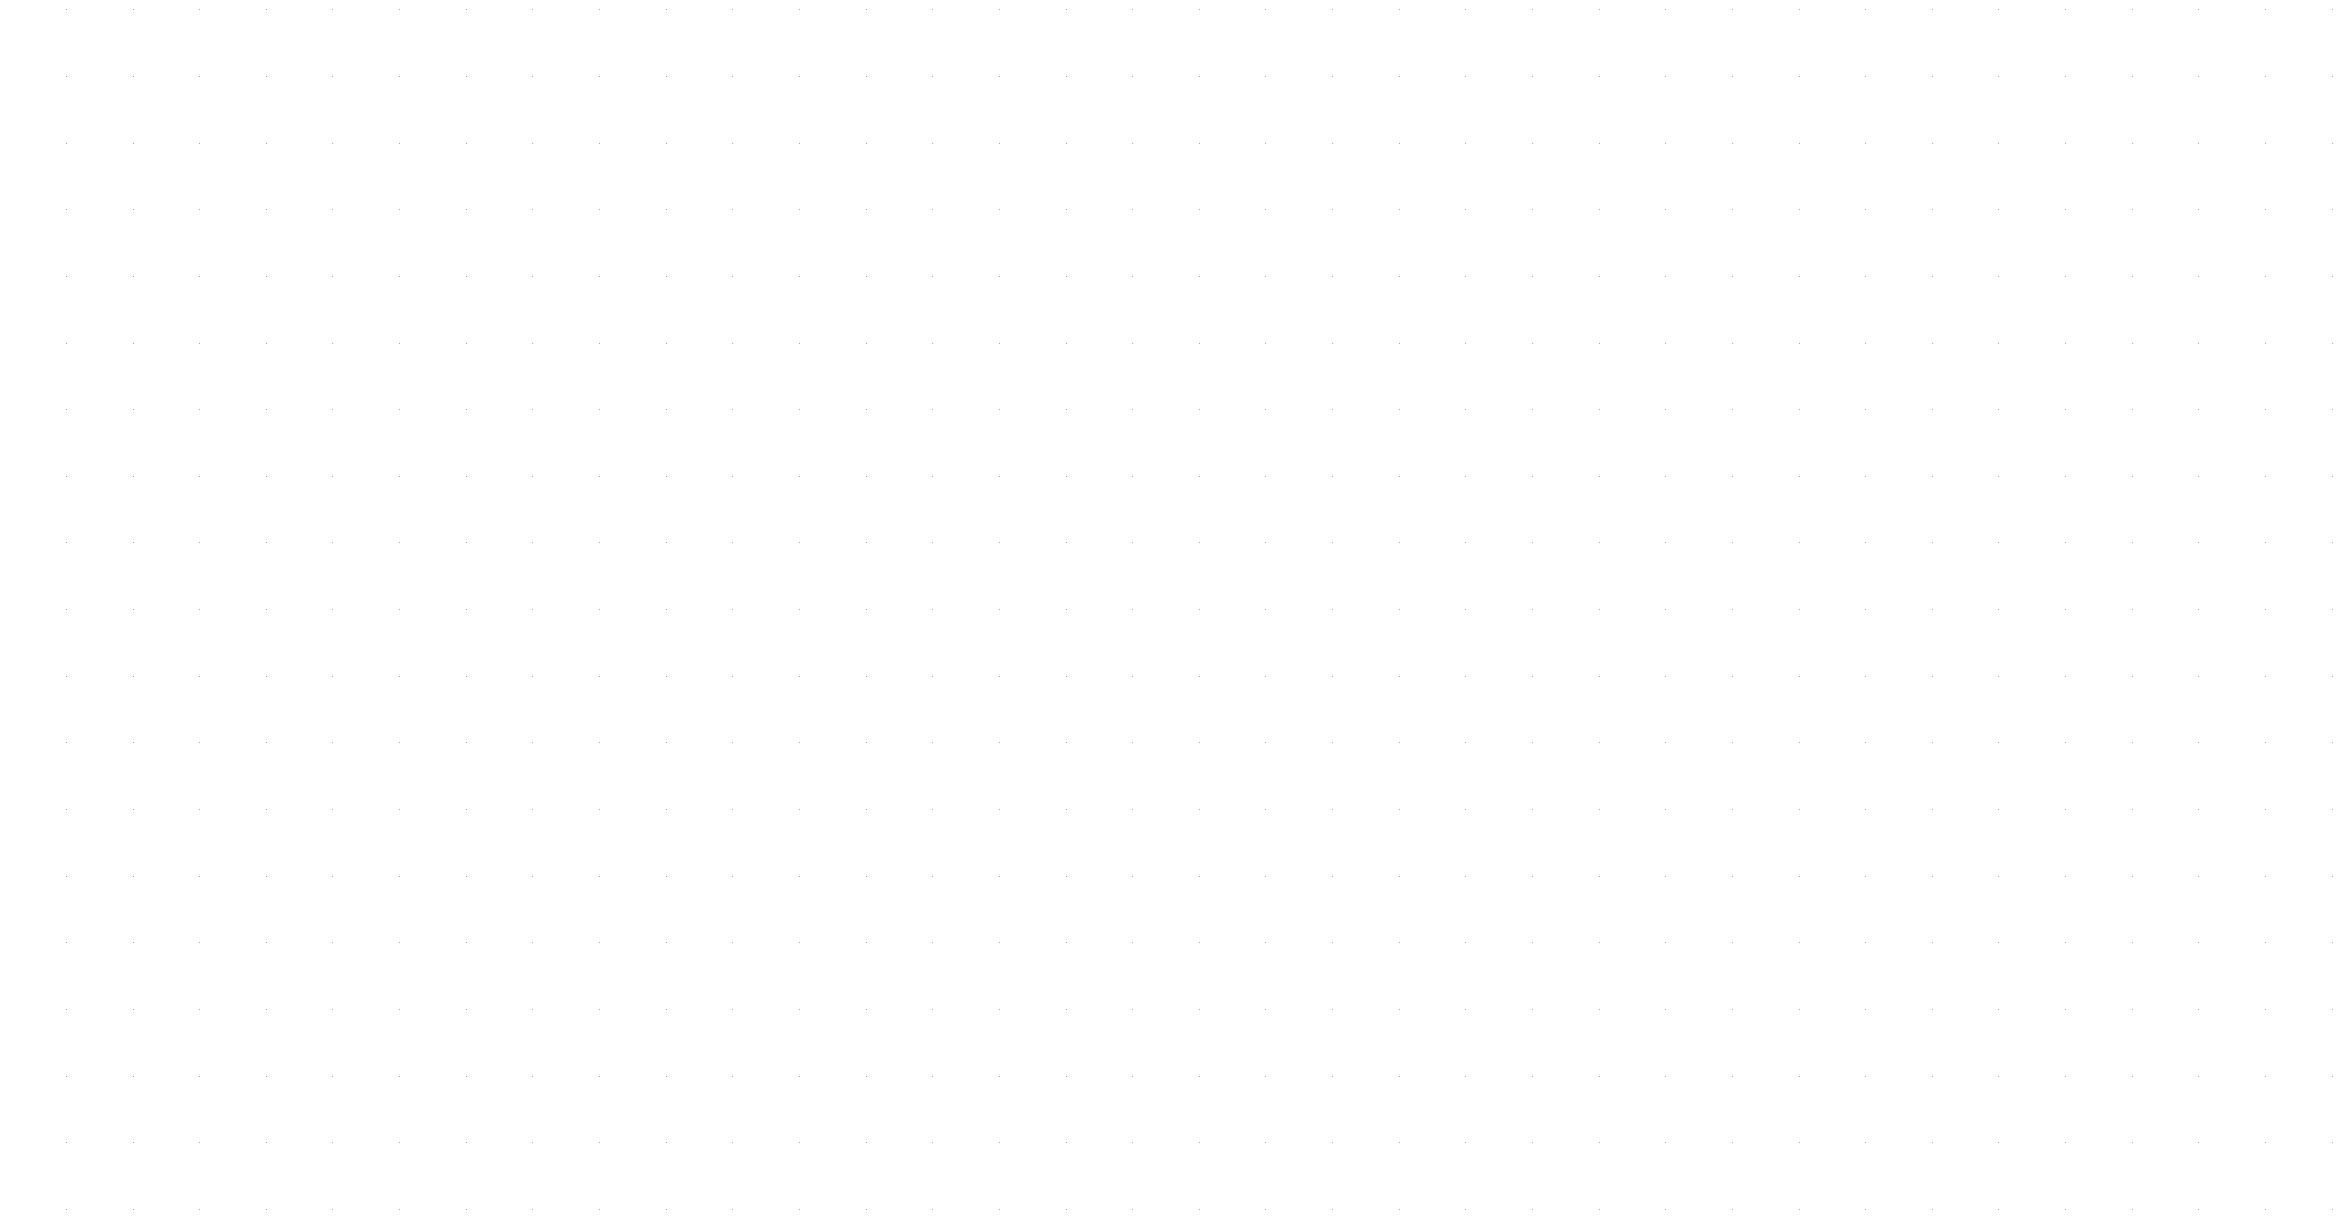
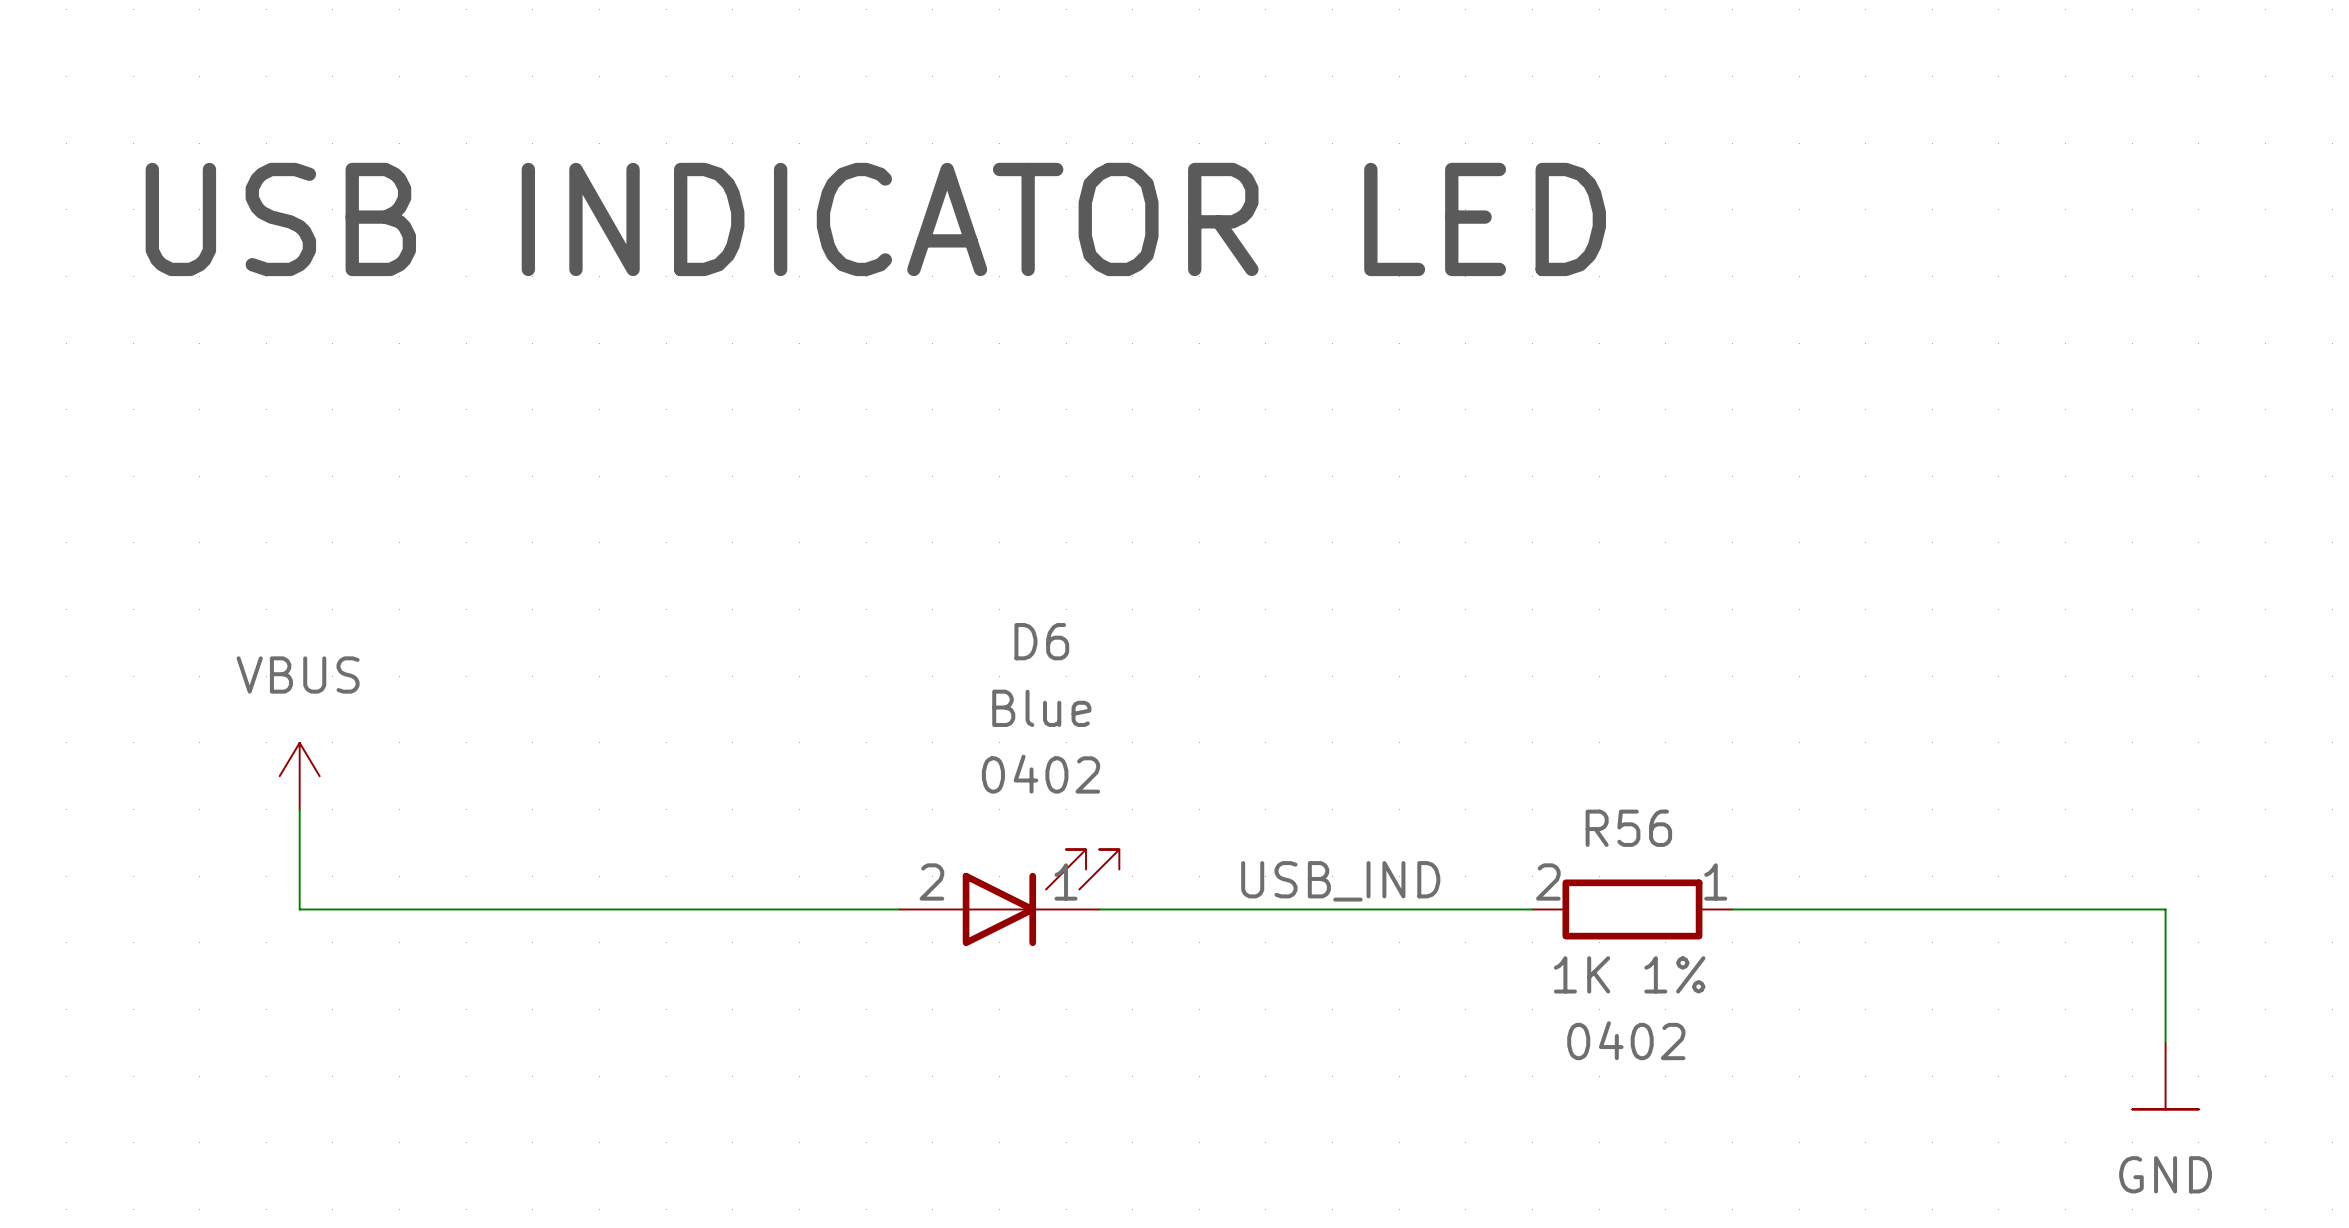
text: none -> USB INDICATOR LED (875, 219)
power symbol: none -> VBUS (299, 776)
wire: none -> (299, 809) (299, 909) (899, 909)
label: none -> USB_IND (1340, 881)
D6: none -> Blue (1009, 897)
wire: none -> (1099, 909) (1532, 909)
R56: none -> 1K 1% (1632, 909)
wire: none -> (1732, 909) (2165, 909) (2165, 1042)
power symbol: none -> GND (2165, 1076)

